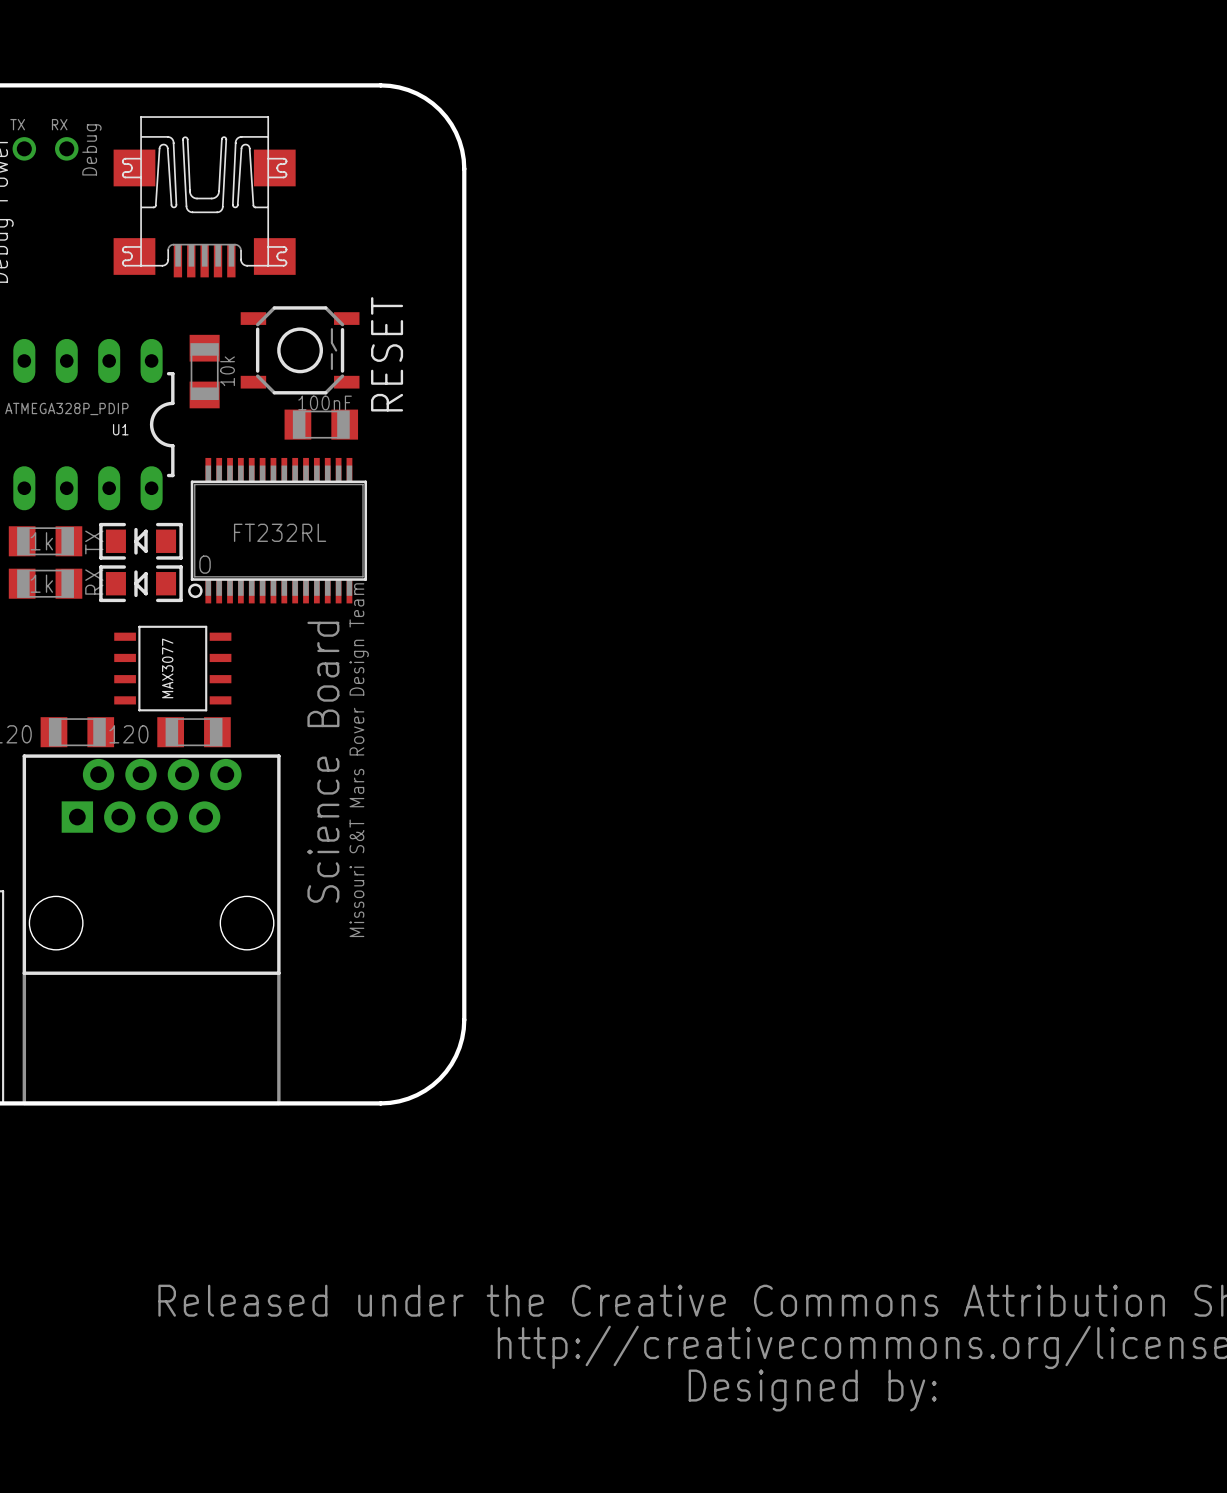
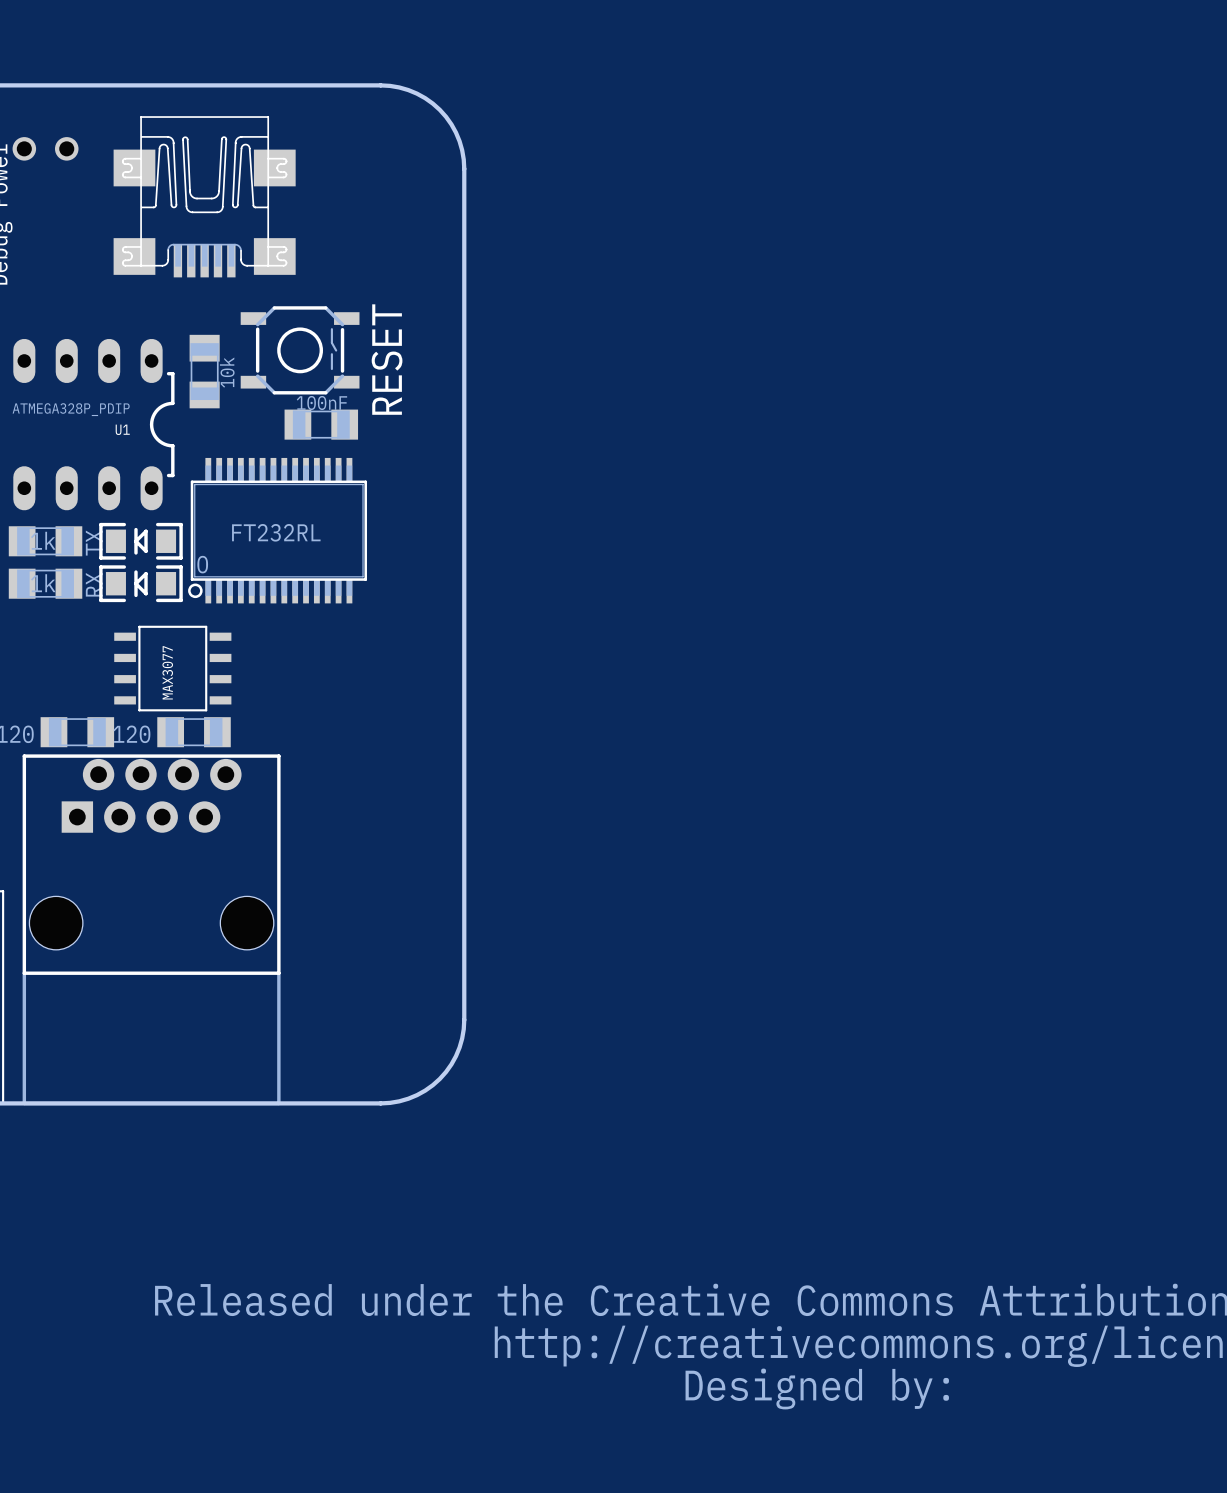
text: TX (17, 124) -> none
text: RX (59, 124) -> none
text: Debug (91, 149) -> none
text: Missouri S&T Mars Rover Design Team (359, 760) -> none
text: Science Board (323, 762) -> none

